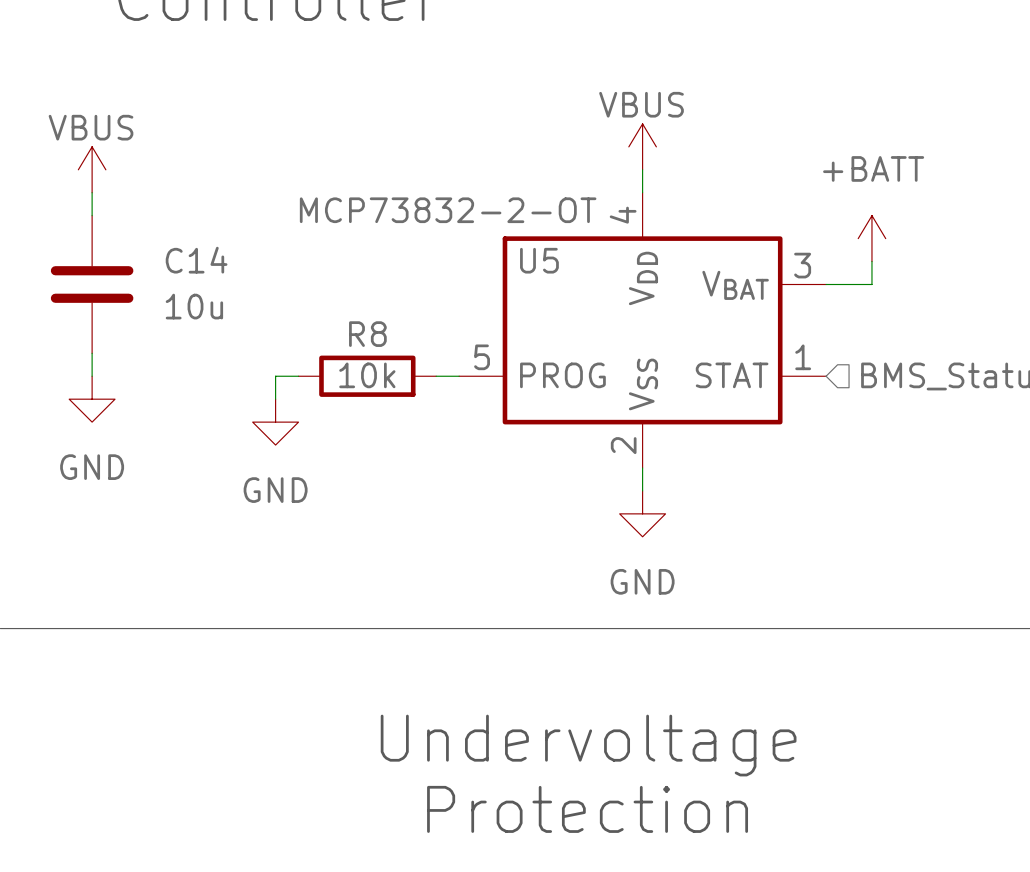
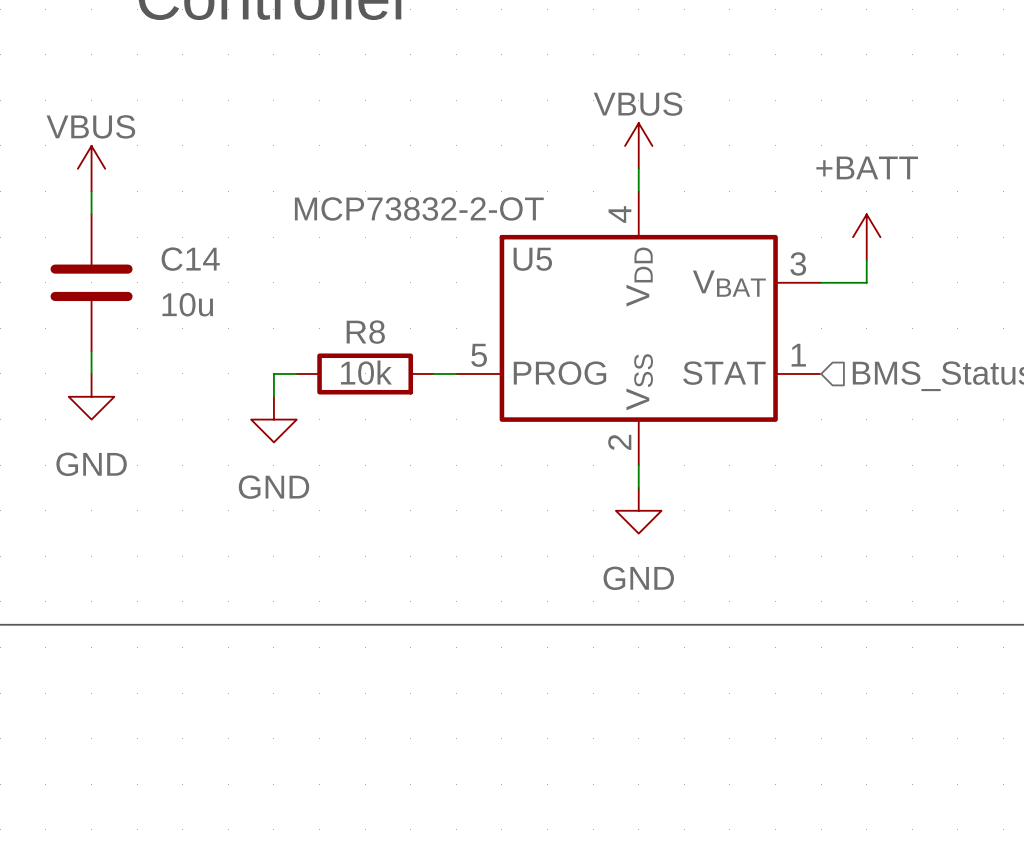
text: Undervoltage (588, 745) -> none
text: Protection (587, 809) -> none

